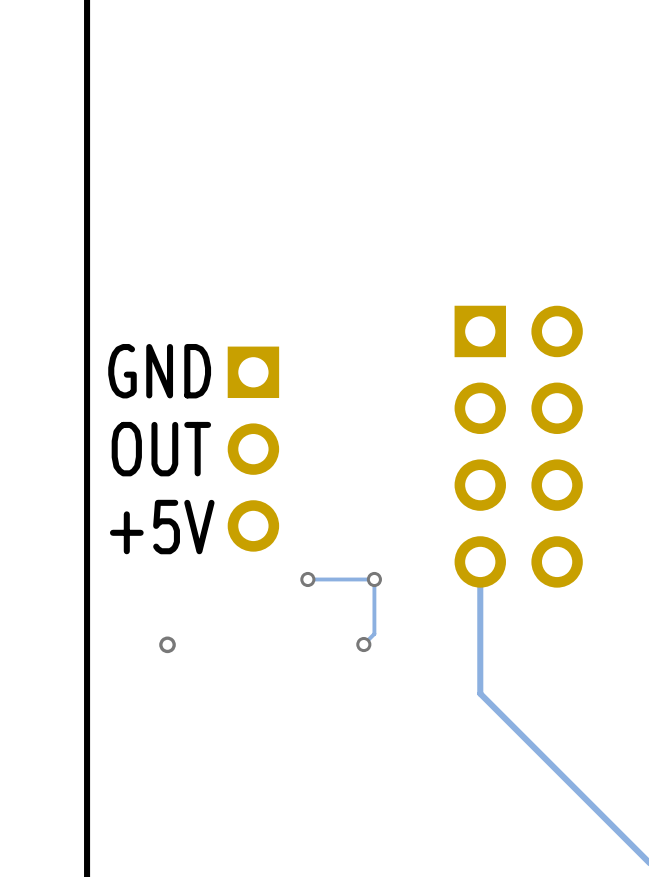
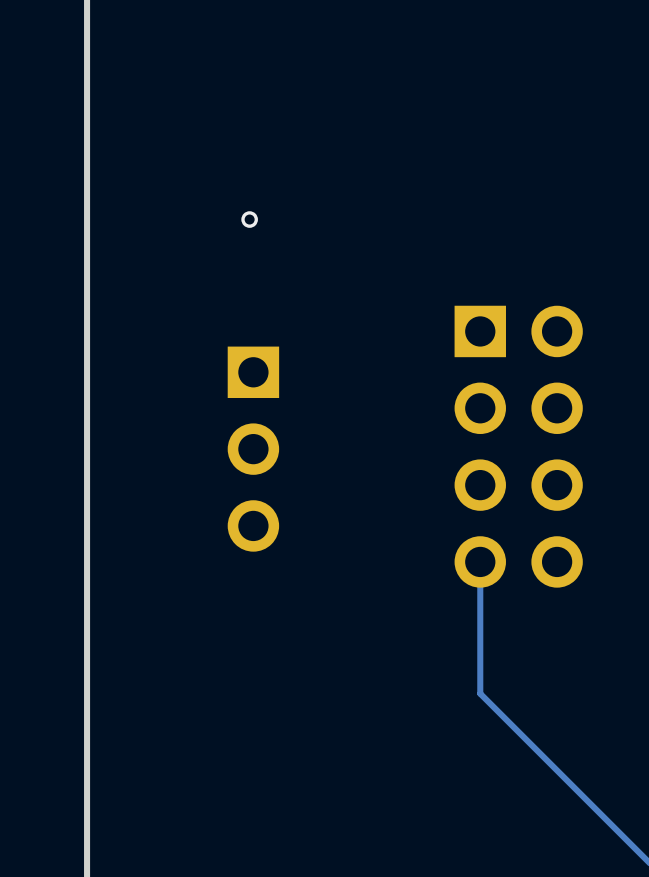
via: none -> (249, 219)
text: GND (159, 371) -> none
text: OUT (161, 449) -> none
text: +5V (162, 527) -> none
track: (307, 579) (374, 579) (374, 633) (363, 644) -> none
via: (307, 579) -> none
via: (374, 579) -> none
via: (167, 644) -> none
via: (363, 644) -> none

